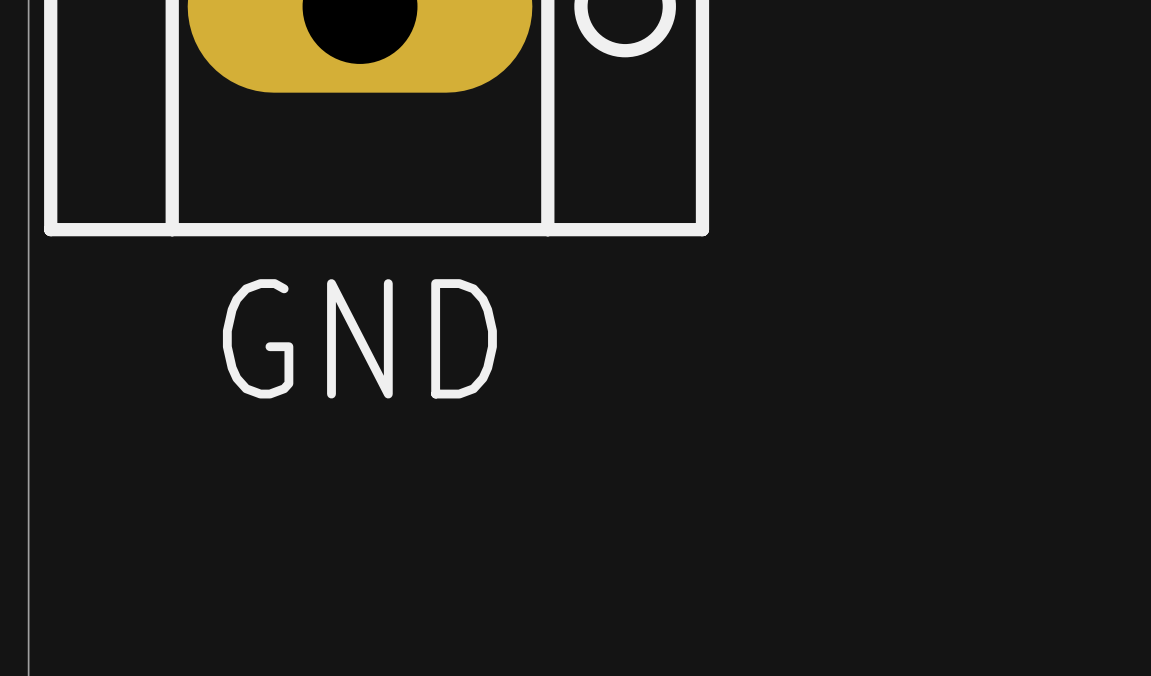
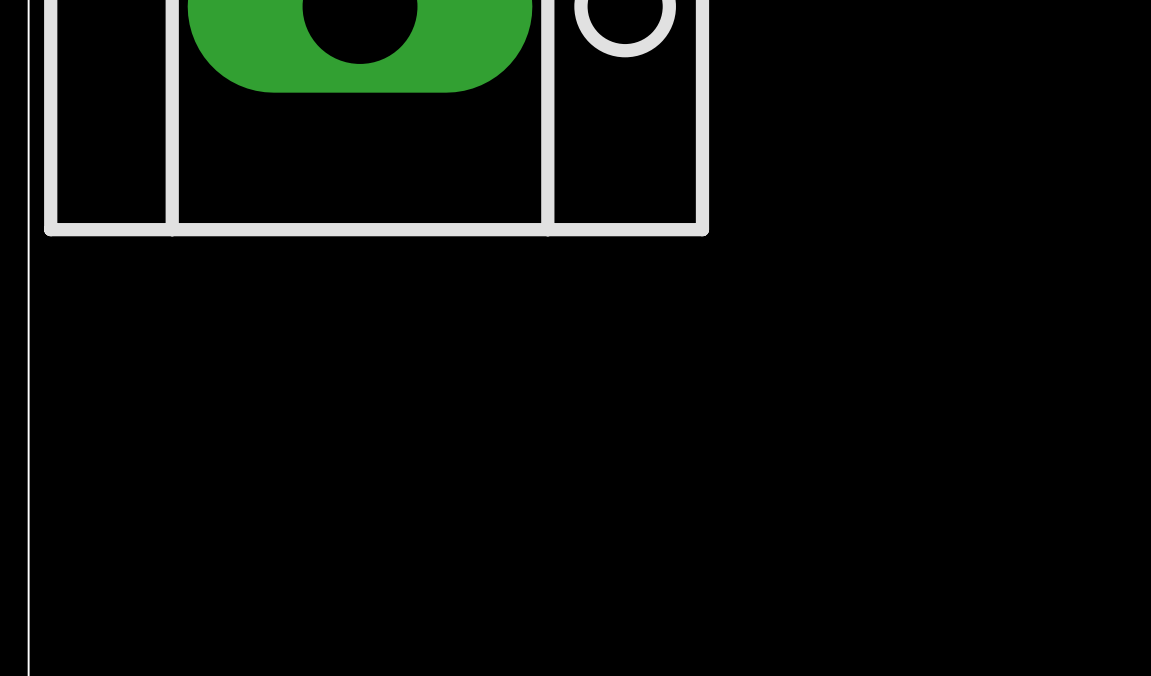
text: GND (359, 338) -> none

